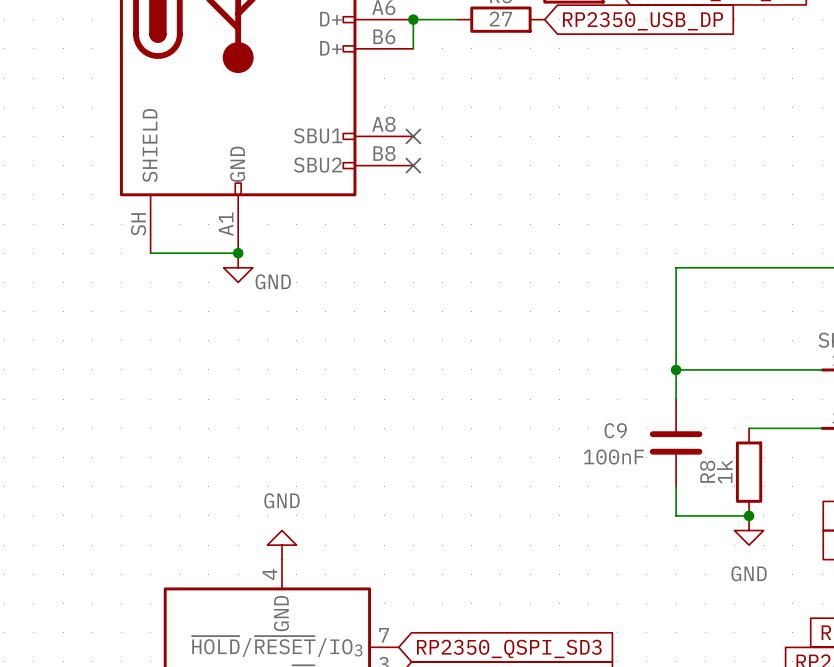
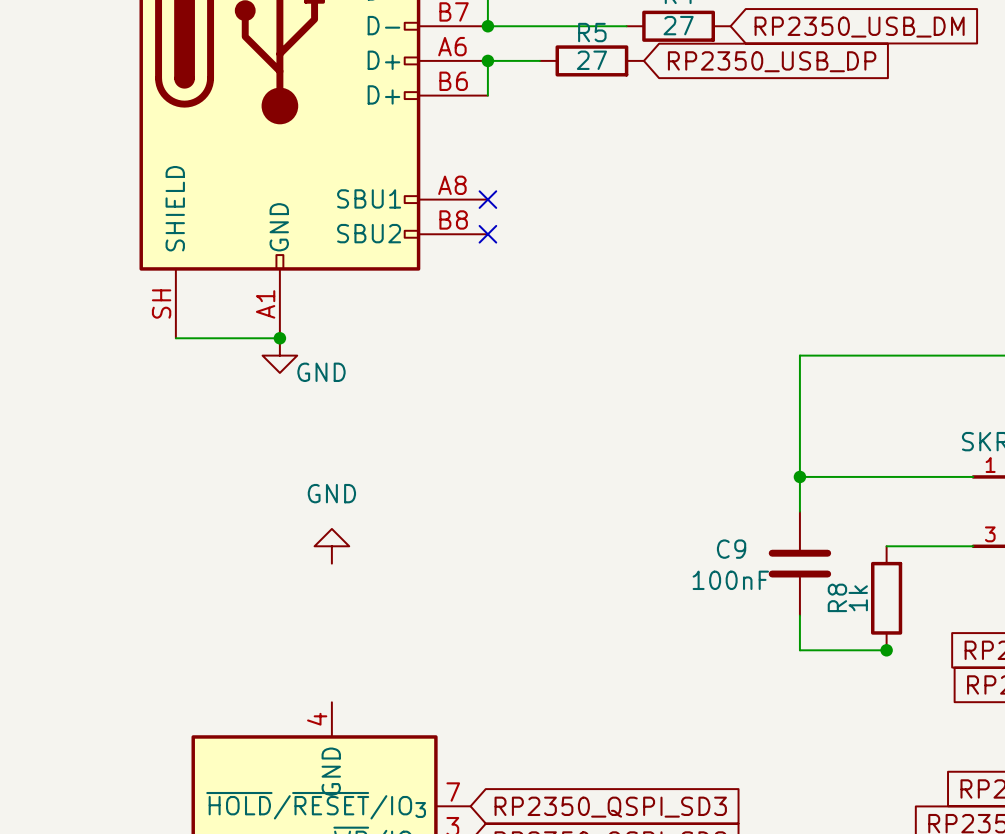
power symbol: GND (749, 530) -> none
power symbol position: GND (281, 545) -> GND (331, 546)

